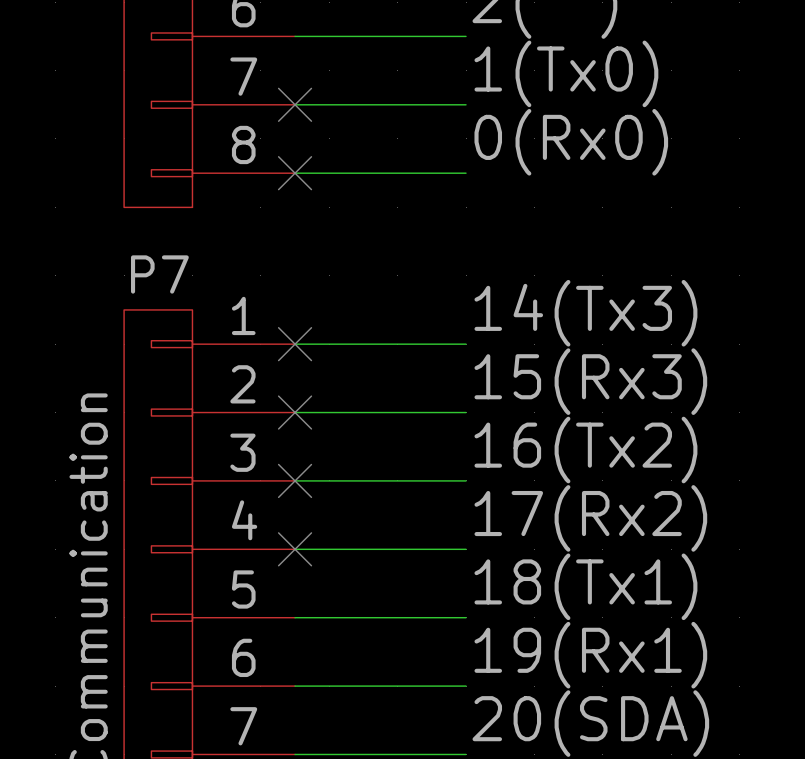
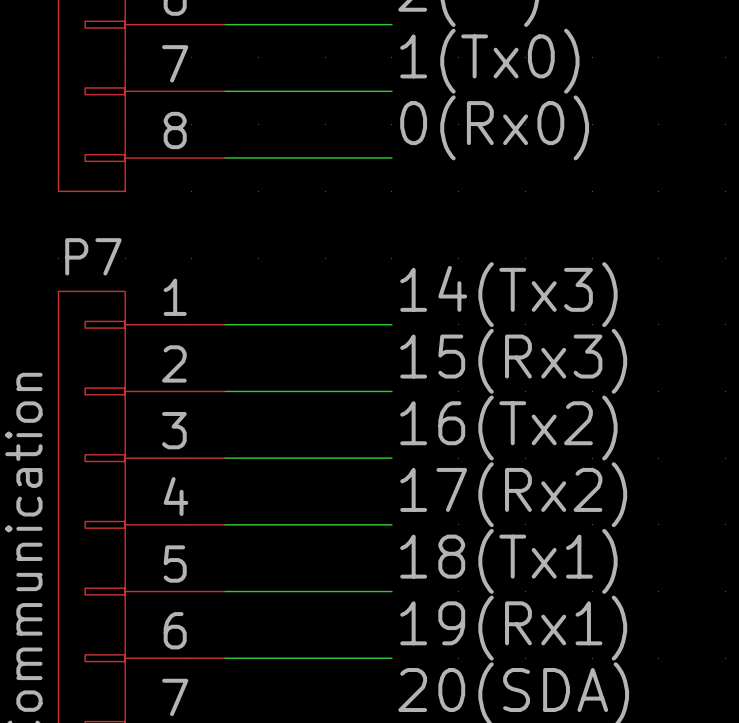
no-connect mark: (295, 104) -> none
no-connect mark: (295, 173) -> none
no-connect mark: (295, 344) -> none
no-connect mark: (295, 412) -> none
no-connect mark: (295, 480) -> none
no-connect mark: (295, 549) -> none

